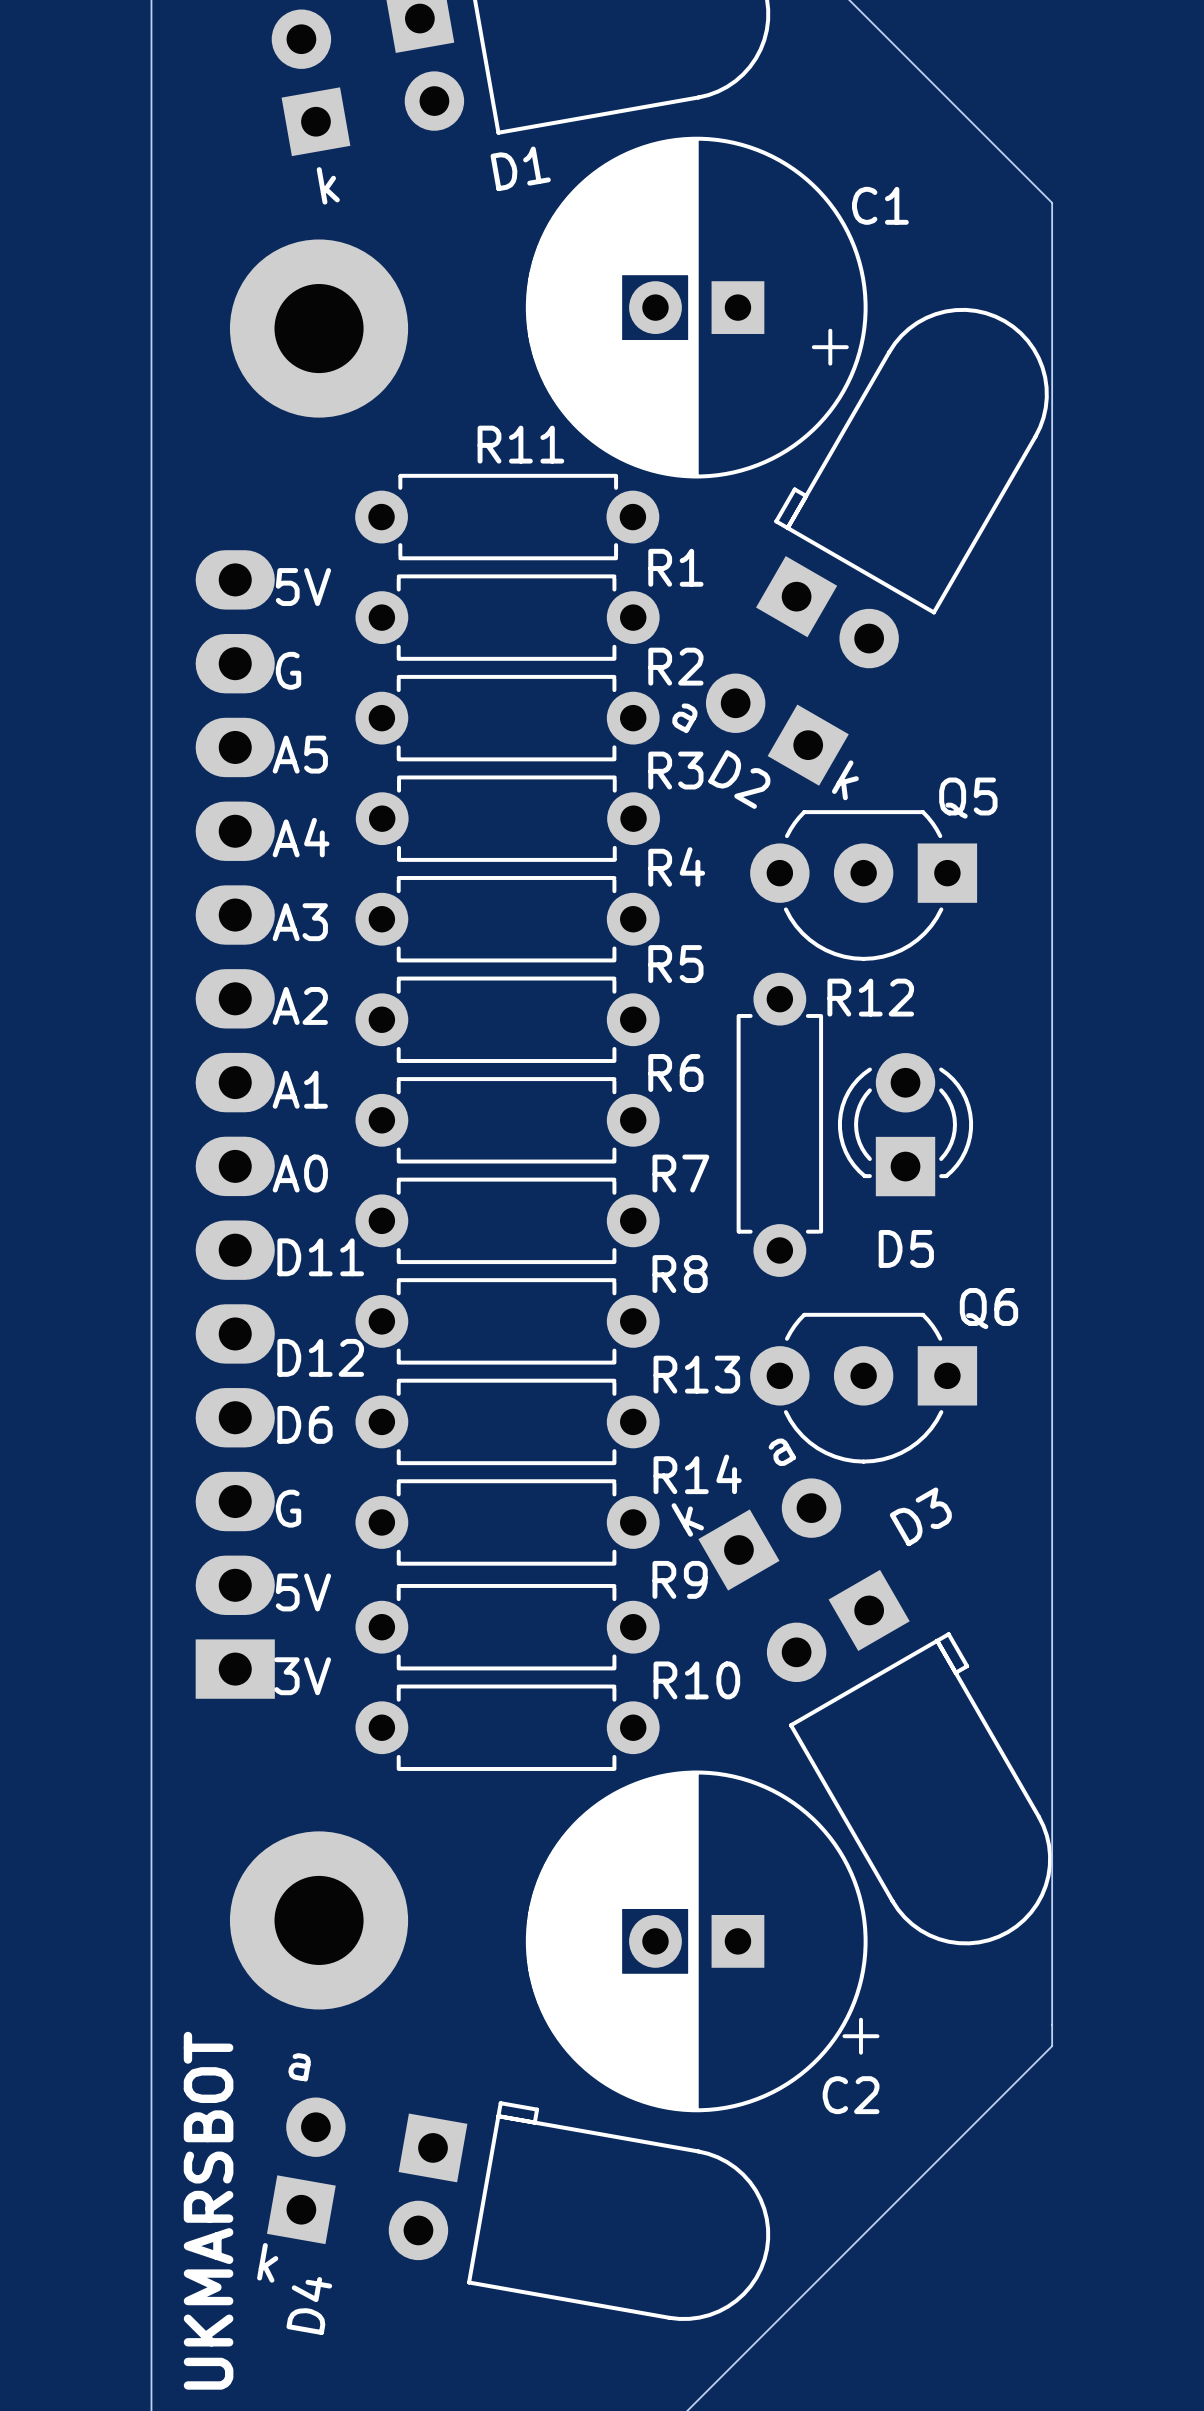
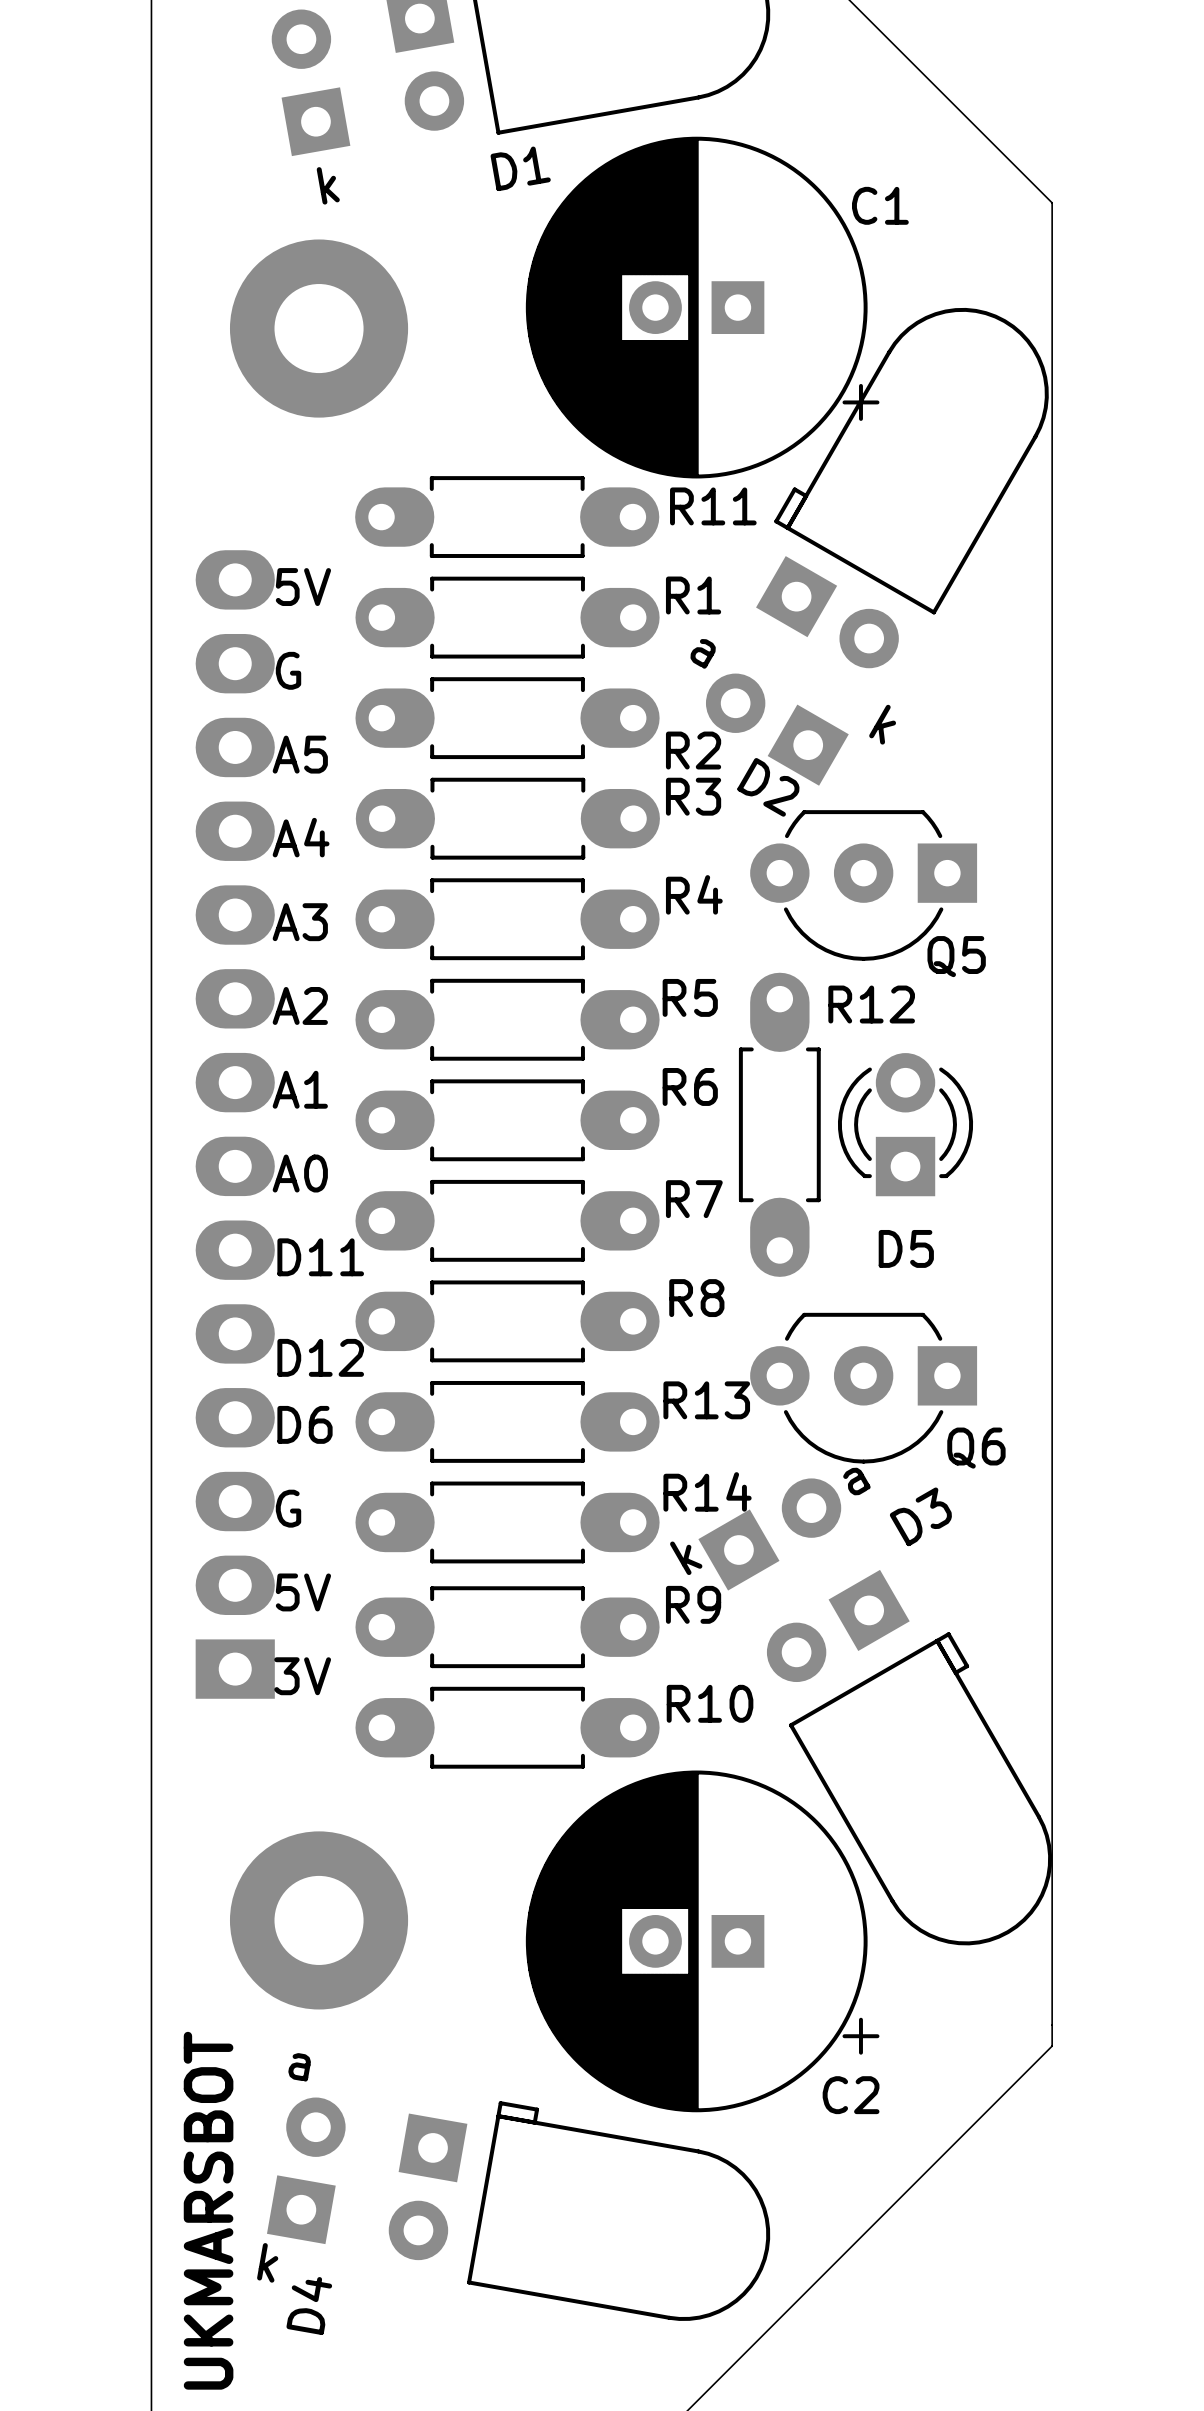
C1 footprint: [525, 136, 868, 479] -> [525, 136, 880, 479]
R11 name position: R11 (520, 444) -> R11 (713, 506)
R11 footprint: [355, 473, 660, 561] -> [355, 476, 660, 558]
R1 footprint: [355, 574, 660, 661] -> [355, 576, 660, 659]
R2 name position: R2 (675, 666) -> R2 (693, 750)
R2 footprint: [355, 674, 660, 762] -> [355, 677, 660, 760]
D2 text position: a (684, 718) -> a (703, 653)
R3 footprint: [355, 775, 660, 862] -> [355, 777, 660, 860]
D2 name position: D2 (739, 779) -> D2 (768, 787)
D2 text position: k (845, 780) -> k (882, 724)
Q5 name position: Q5 (968, 798) -> Q5 (956, 956)
R4 footprint: [355, 876, 660, 963] -> [355, 878, 660, 961]
R12 footprint: [736, 972, 824, 1277] -> [738, 972, 821, 1277]
R5 footprint: [355, 976, 660, 1063] -> [355, 978, 660, 1061]
R6 footprint: [355, 1077, 660, 1164] -> [355, 1079, 660, 1162]
R7 footprint: [355, 1177, 660, 1265] -> [355, 1179, 660, 1262]
R8 footprint: [355, 1278, 660, 1365] -> [355, 1280, 660, 1363]
Q6 name position: Q6 (988, 1308) -> Q6 (976, 1448)
R13 footprint: [355, 1378, 660, 1466] -> [355, 1380, 660, 1463]
D3 text position: a (782, 1452) -> a (856, 1481)
R14 footprint: [355, 1479, 660, 1566] -> [355, 1481, 660, 1564]
D3 text position: k (687, 1519) -> k (686, 1558)
R9 footprint: [355, 1583, 660, 1671] -> [355, 1586, 660, 1669]
R10 footprint: [355, 1684, 660, 1771] -> [355, 1686, 660, 1769]

